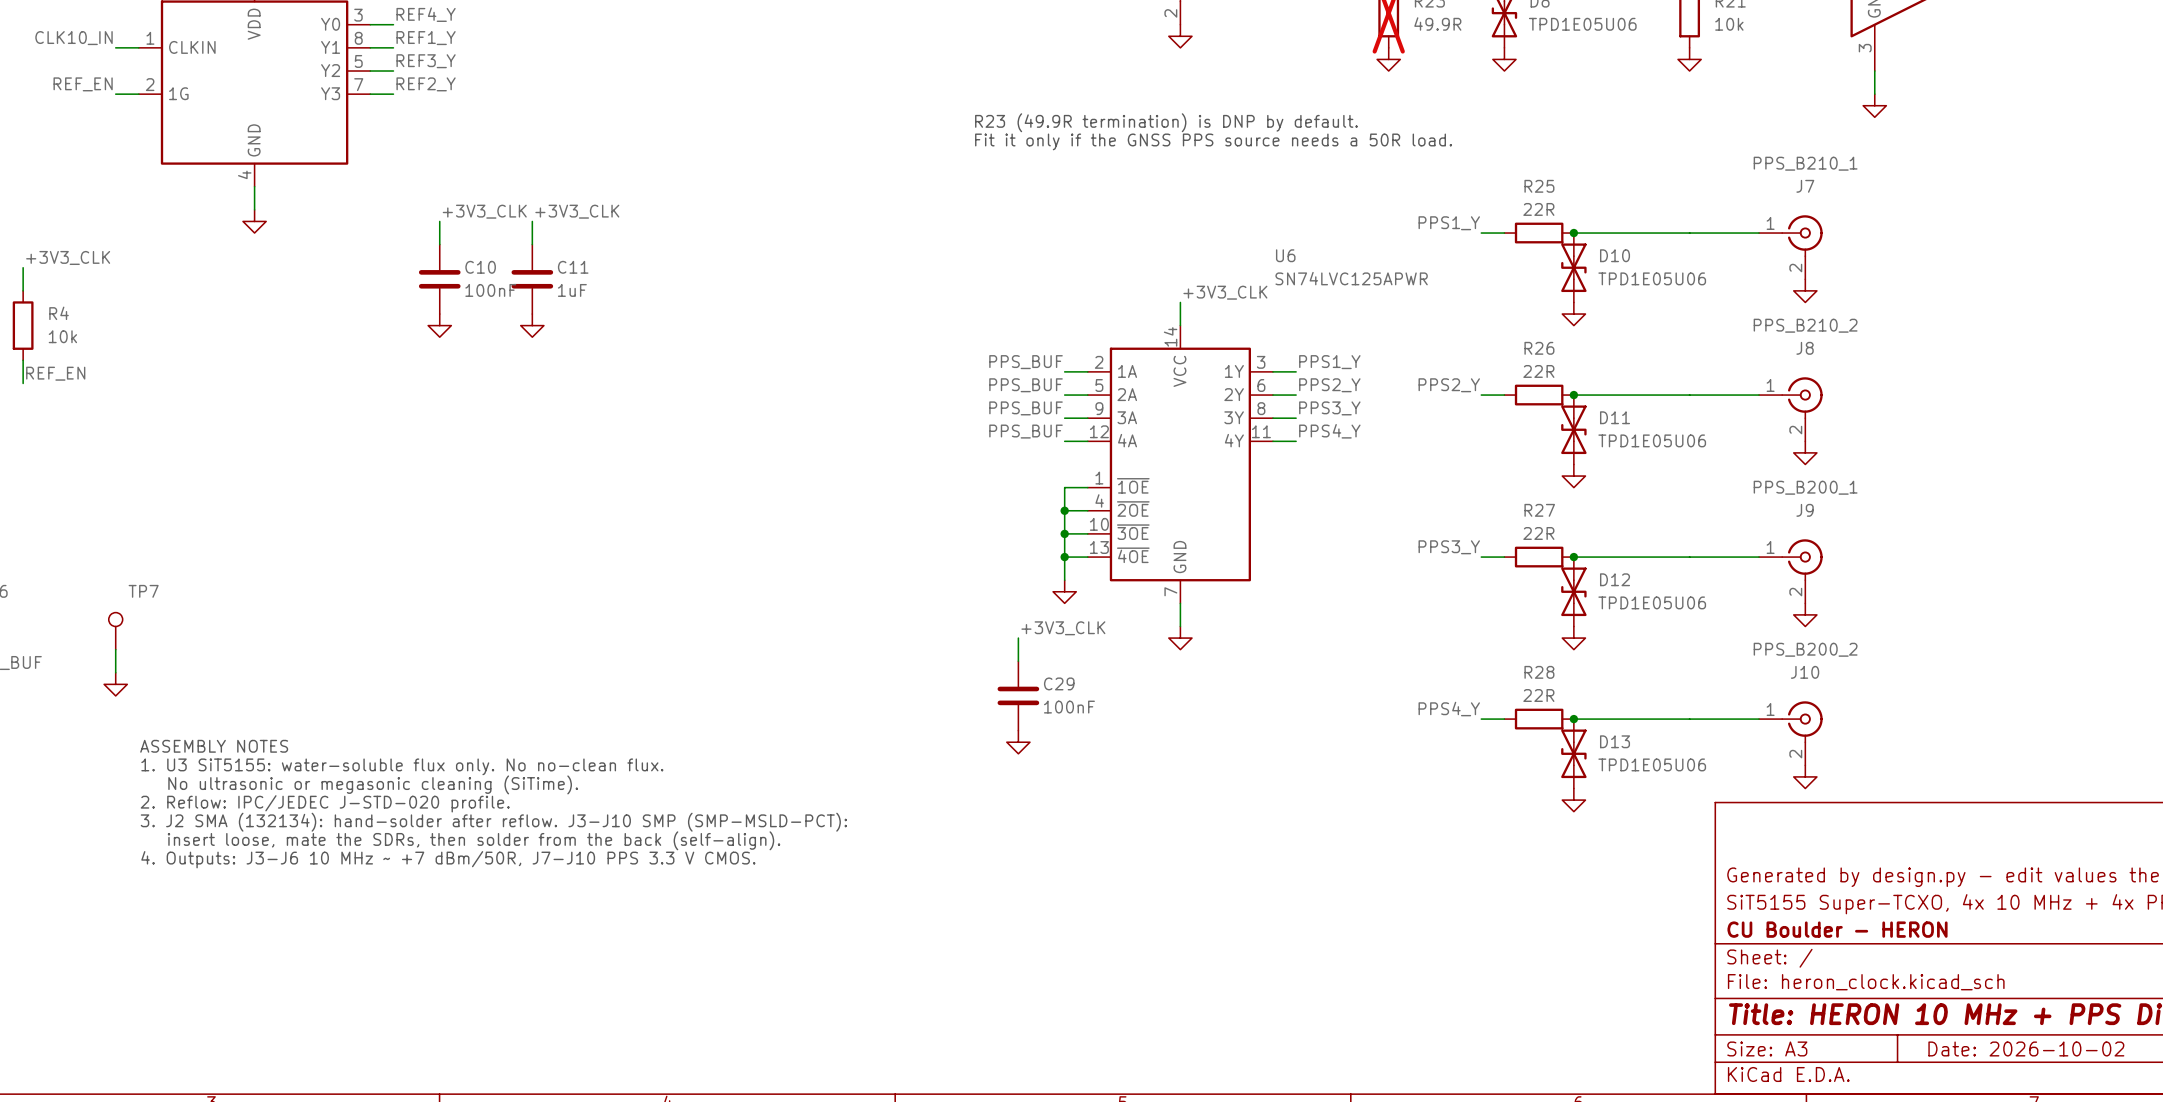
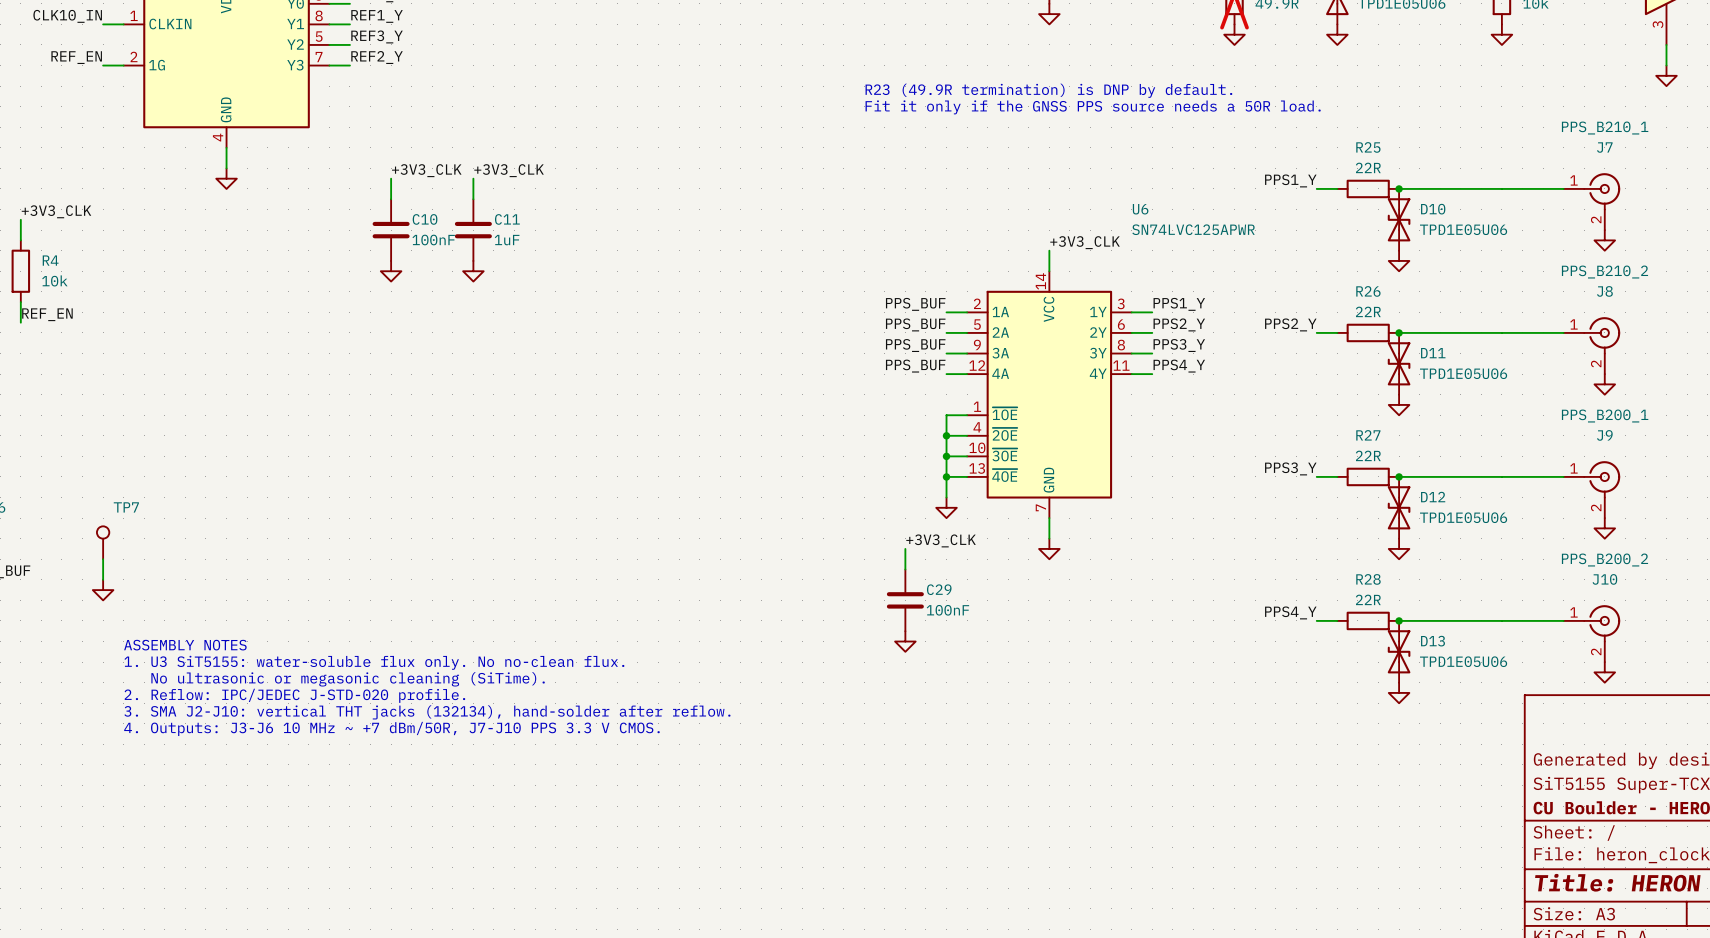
text: 3. J2 SMA (132134): hand-solder after reflow. J3-J10 SMP (SMP-MSLD-PCT): (493, 822) -> 3. SMA J2-J10: vertical THT jacks (132134), hand-solder after reflow. (427, 712)
text: insert loose, mate the SDRs, then solder from the back (self-align). (474, 840) -> 4. Outputs: J3-J6 10 MHz ~ +7 dBm/50R, J7-J10 PPS 3.3 V CMOS. (391, 728)
text: 4. Outputs: J3-J6 10 MHz ~ +7 dBm/50R, J7-J10 PPS 3.3 V CMOS. (448, 859) -> none

